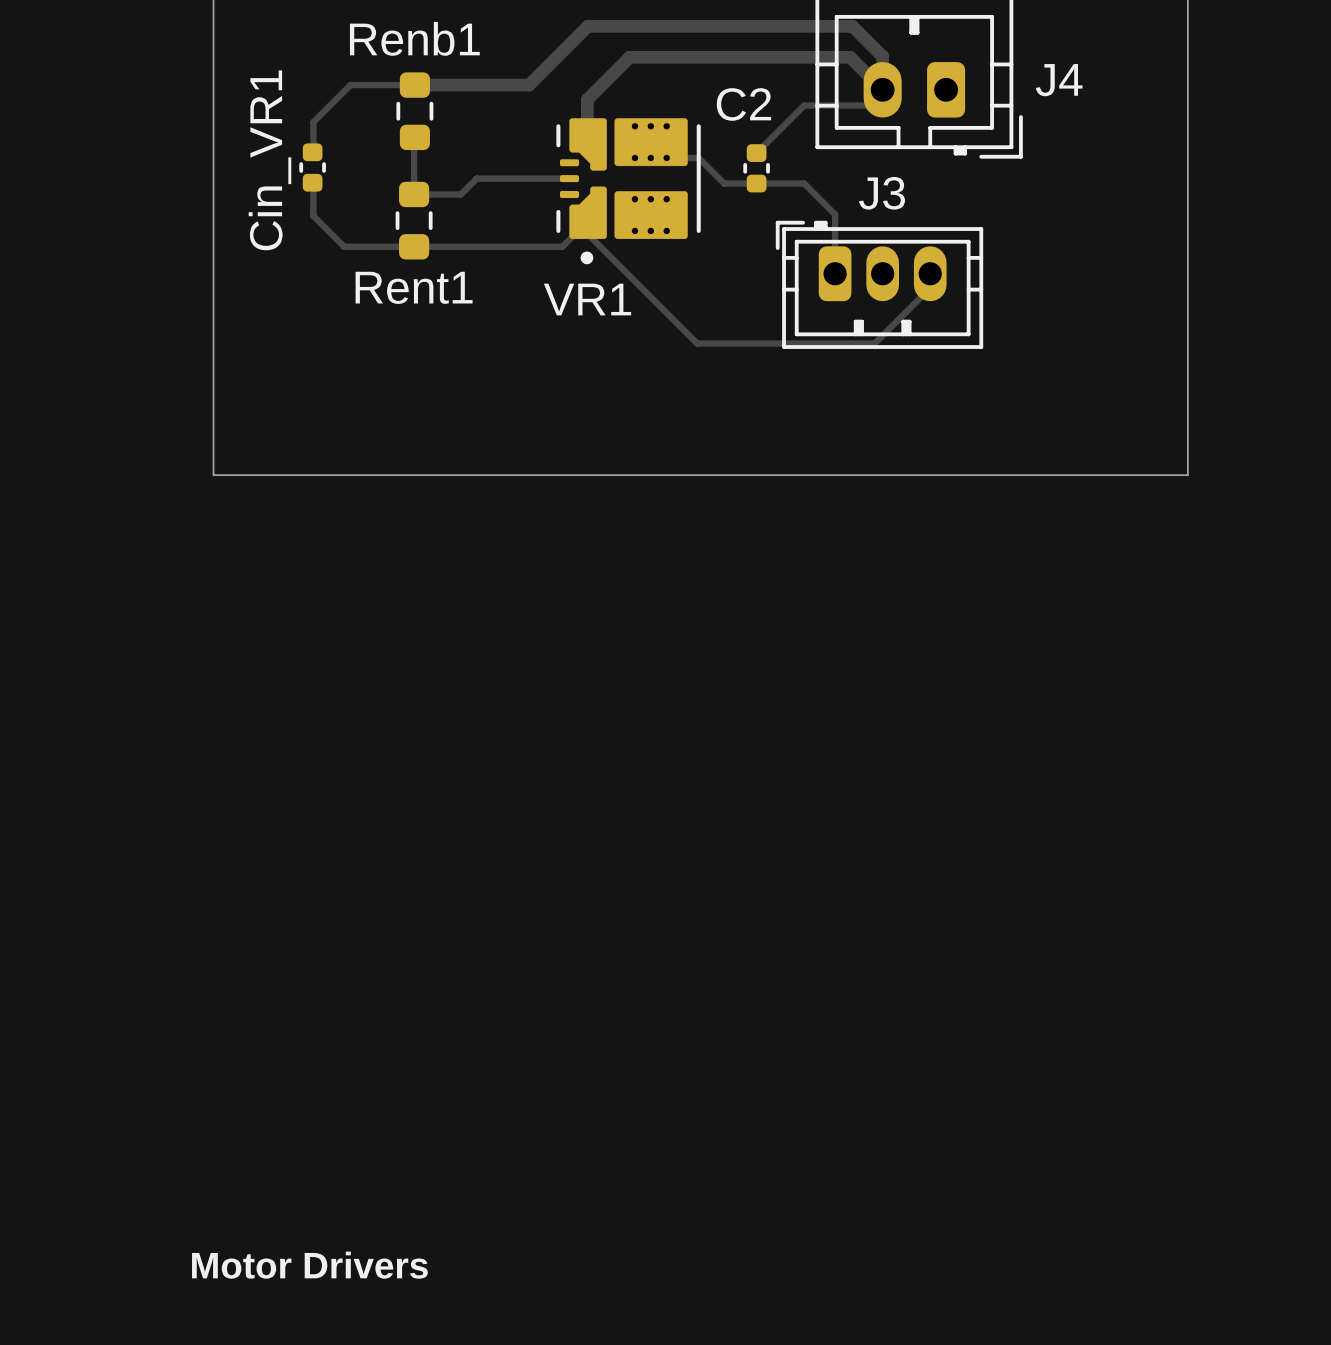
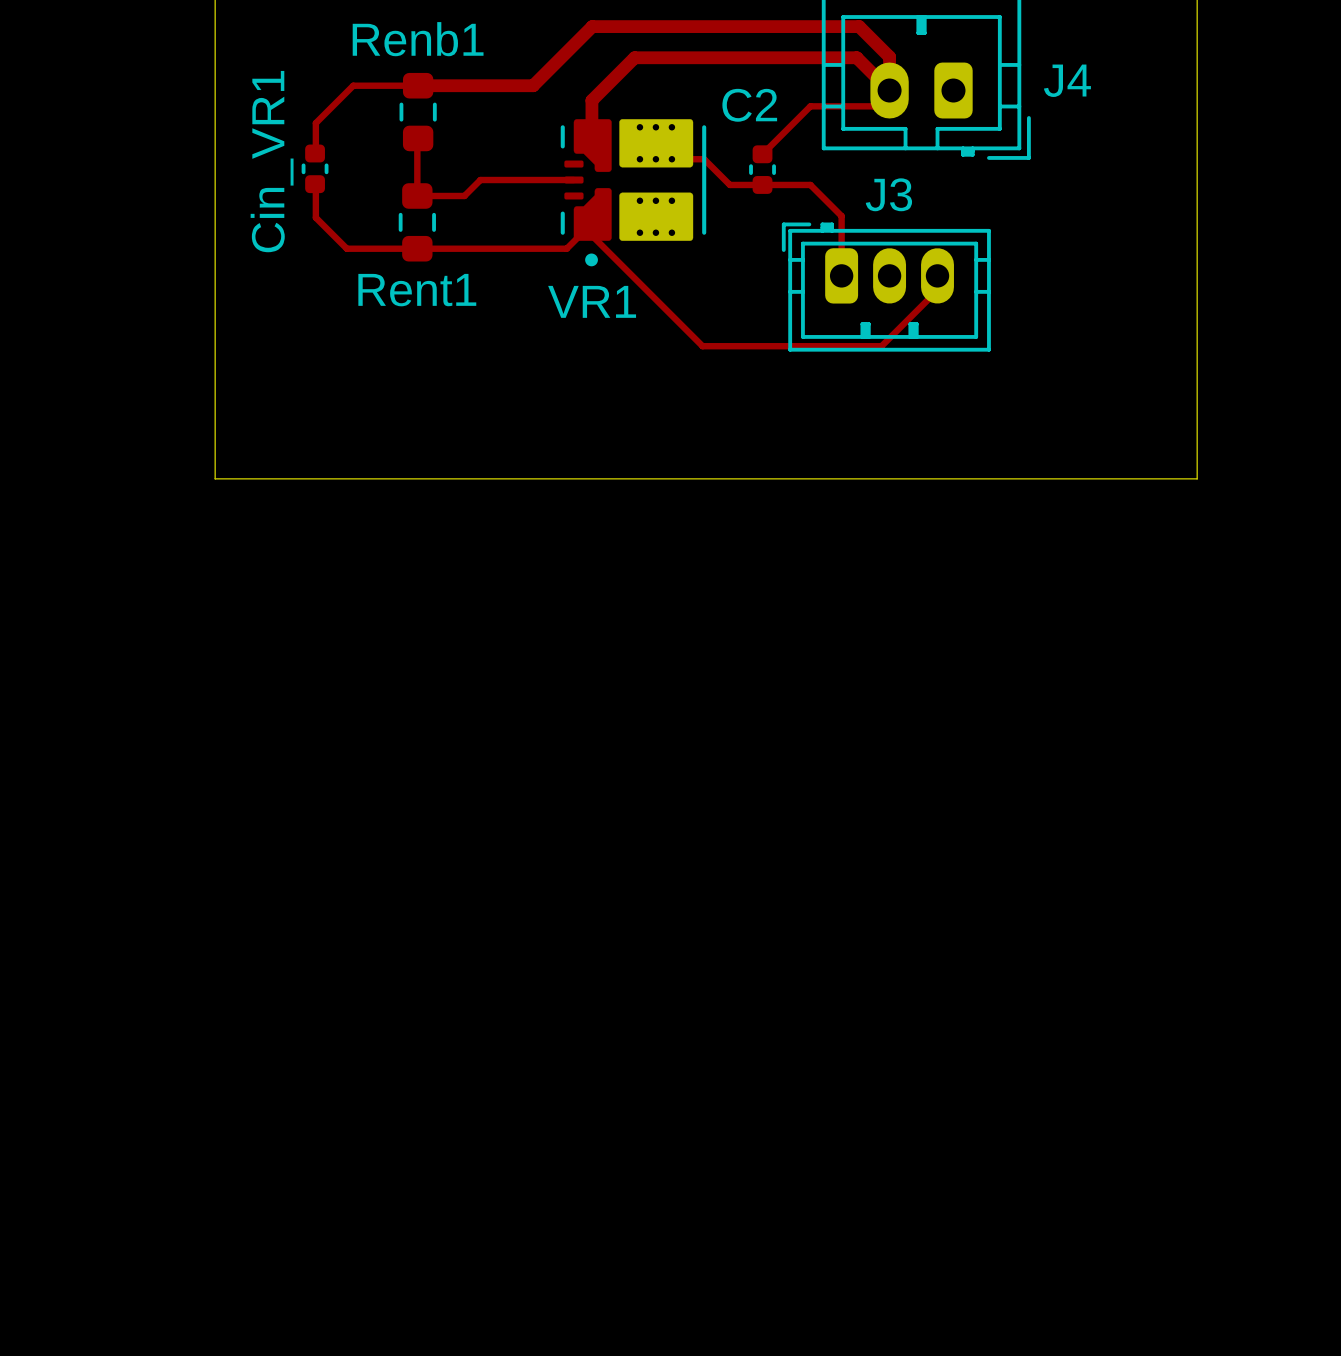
text: Motor Drivers (309, 1265) -> none

